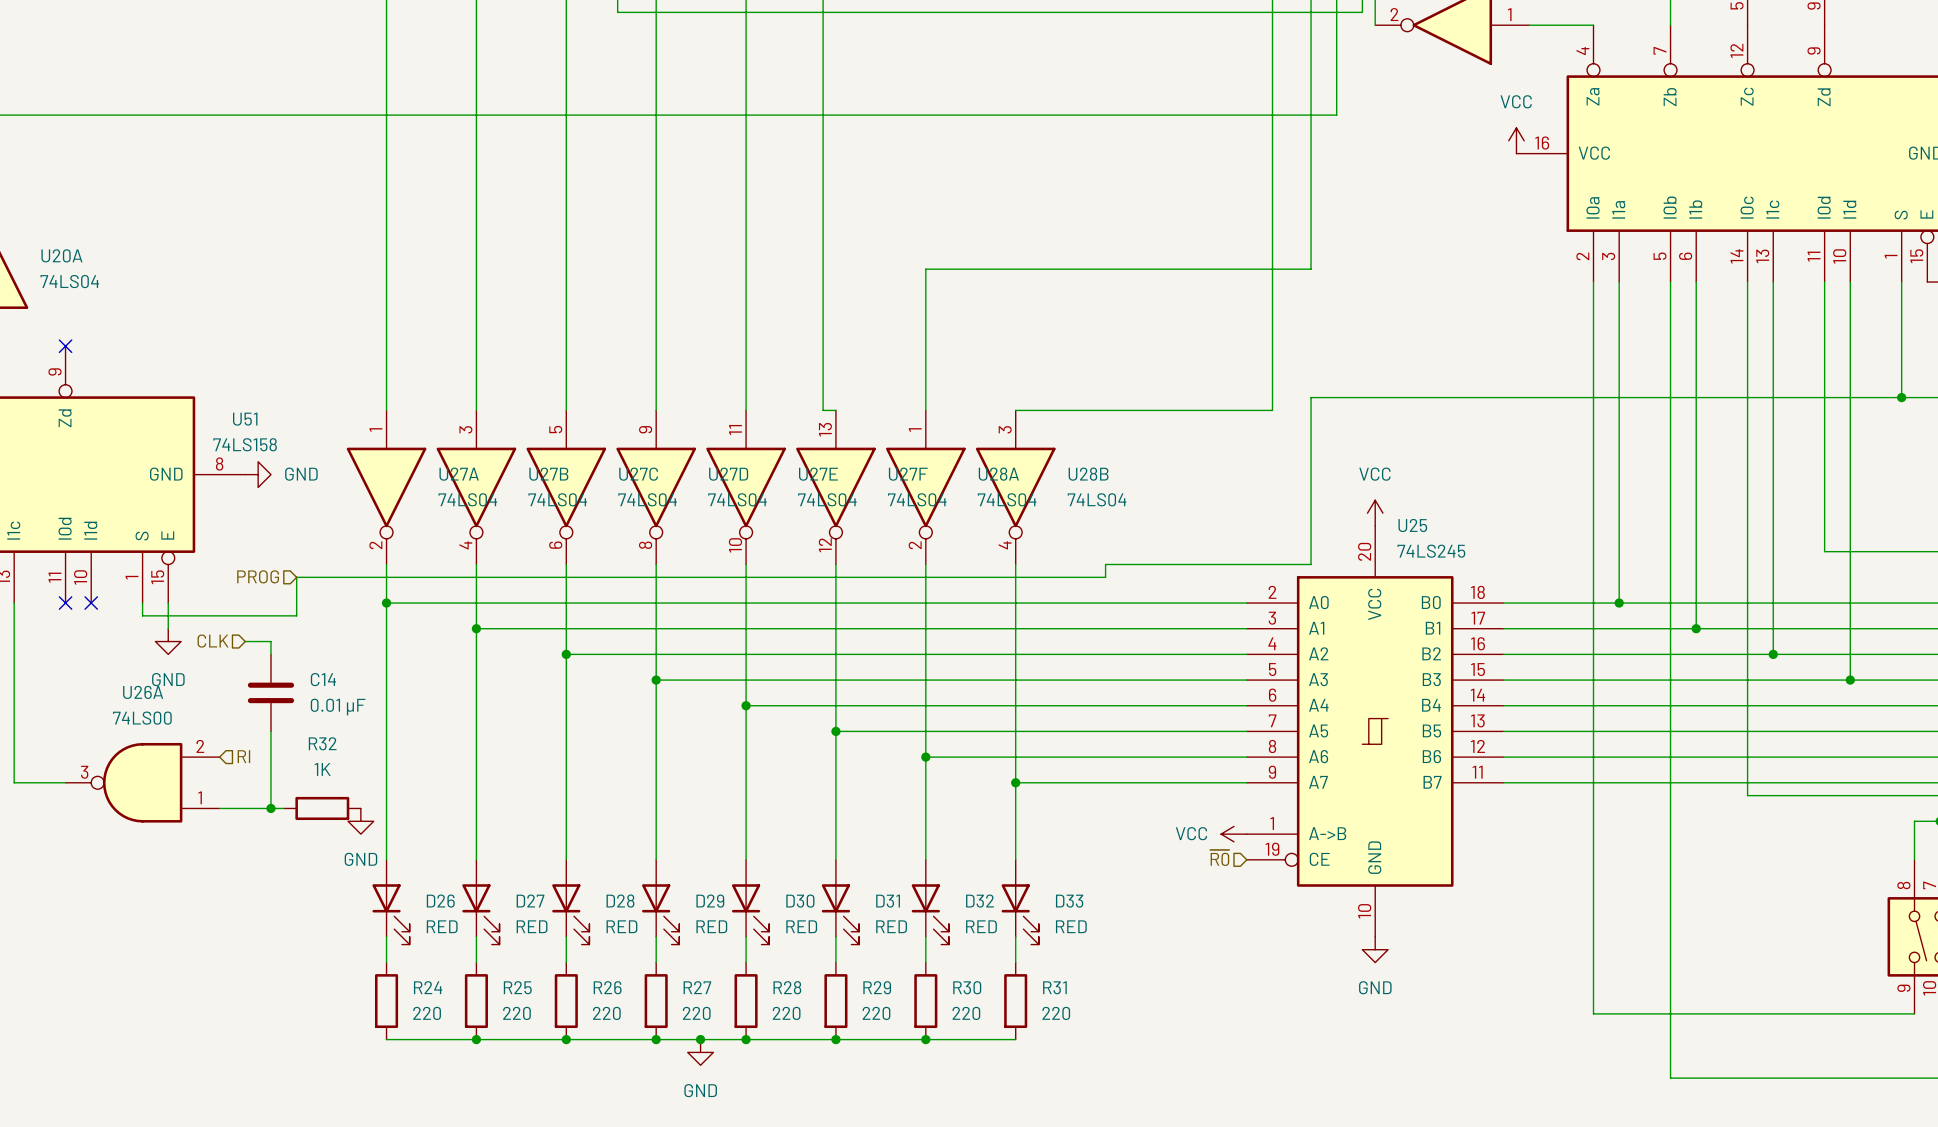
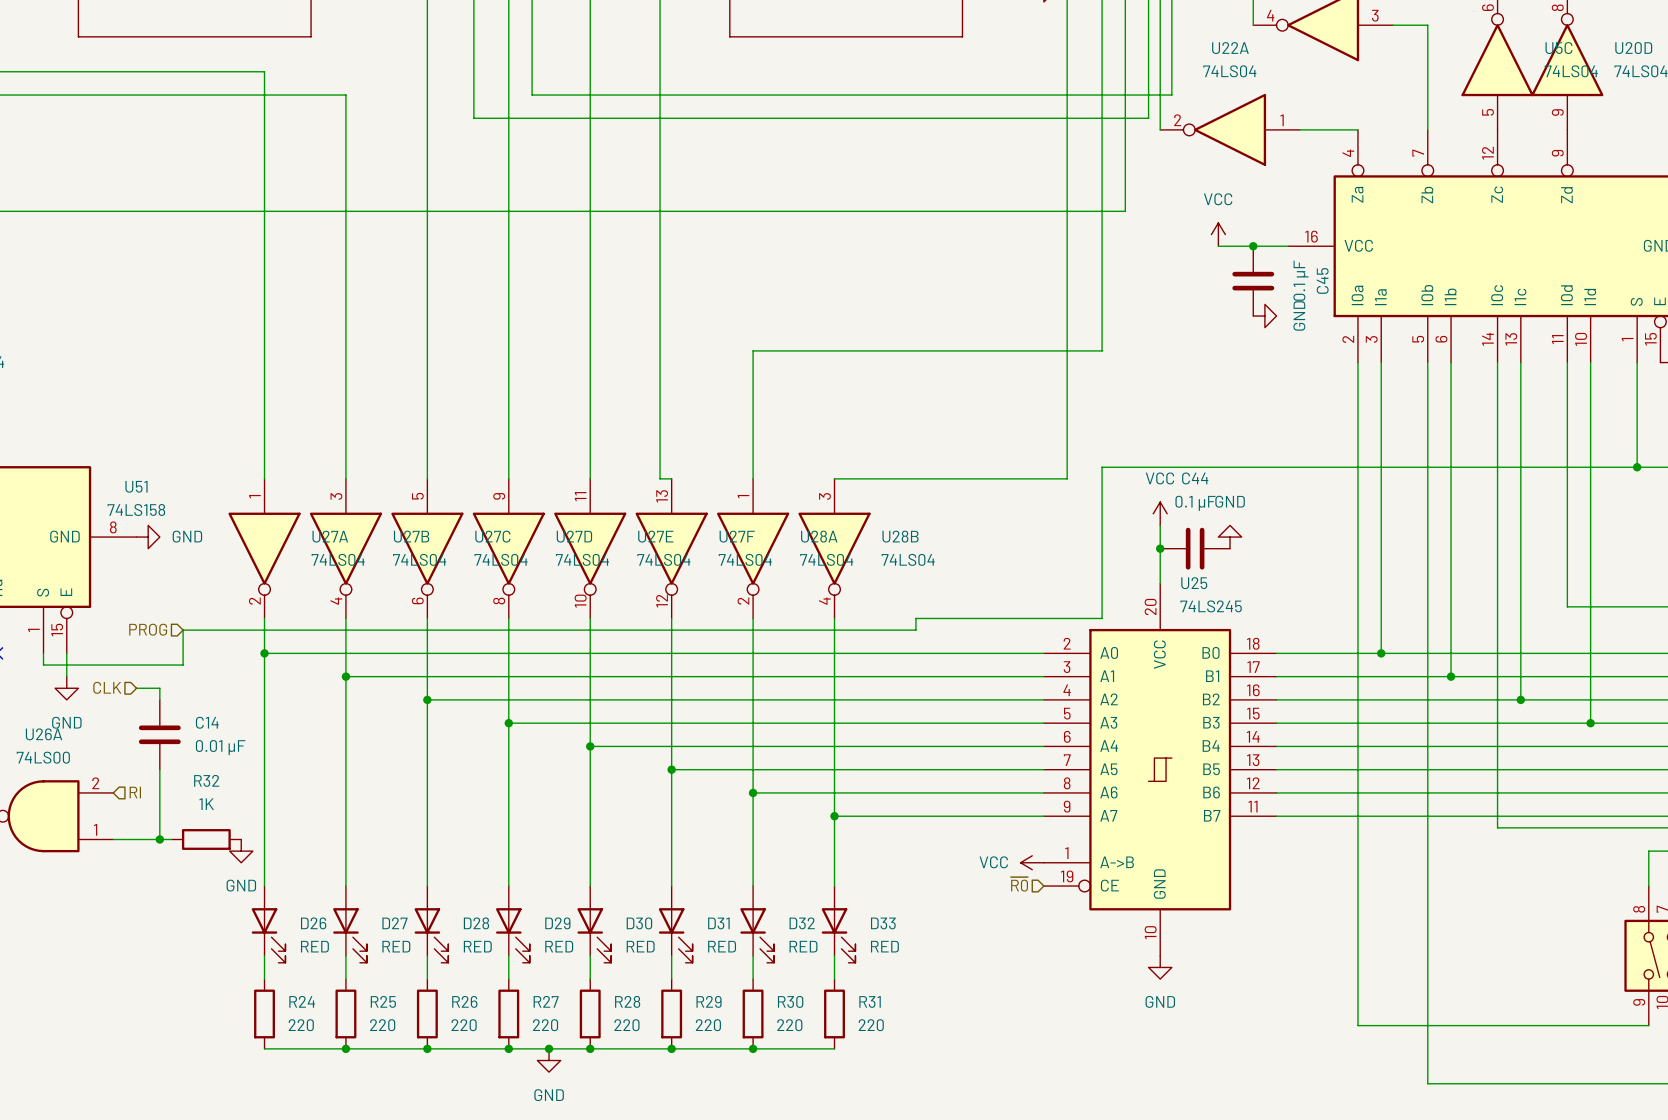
power symbol position: VCC (1516, 140) -> VCC (1218, 234)
wire: none -> (1218, 246) (1288, 246)
junction: none -> (1253, 246)
C45: none -> 0.1 µF (1253, 281)
power symbol: none -> GND (1264, 316)
wire: none -> (1160, 525) (1160, 583)
power symbol: none -> GND (1230, 537)
junction: none -> (1160, 548)
C44: none -> 0.1 µF (1195, 548)
power symbol position: VCC (1375, 513) -> VCC (1160, 513)

